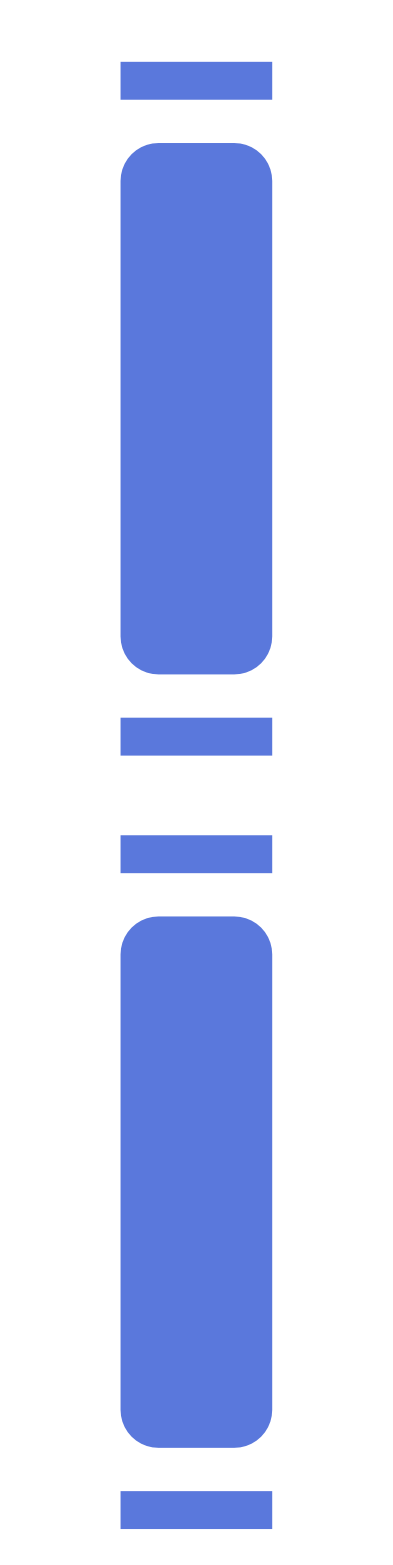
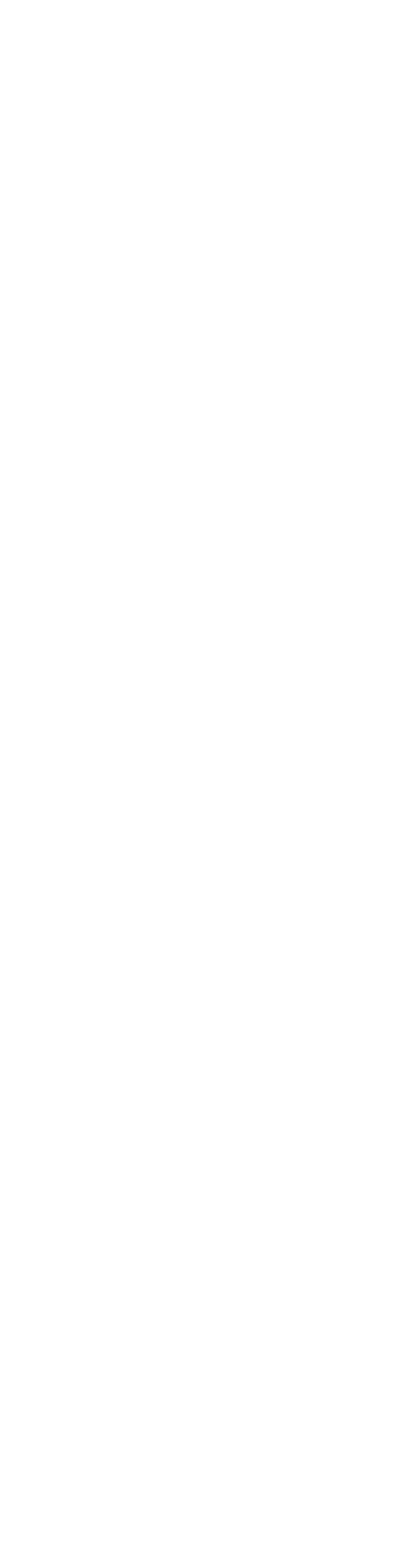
part: (196, 408) -> none
part: (196, 1182) -> none

